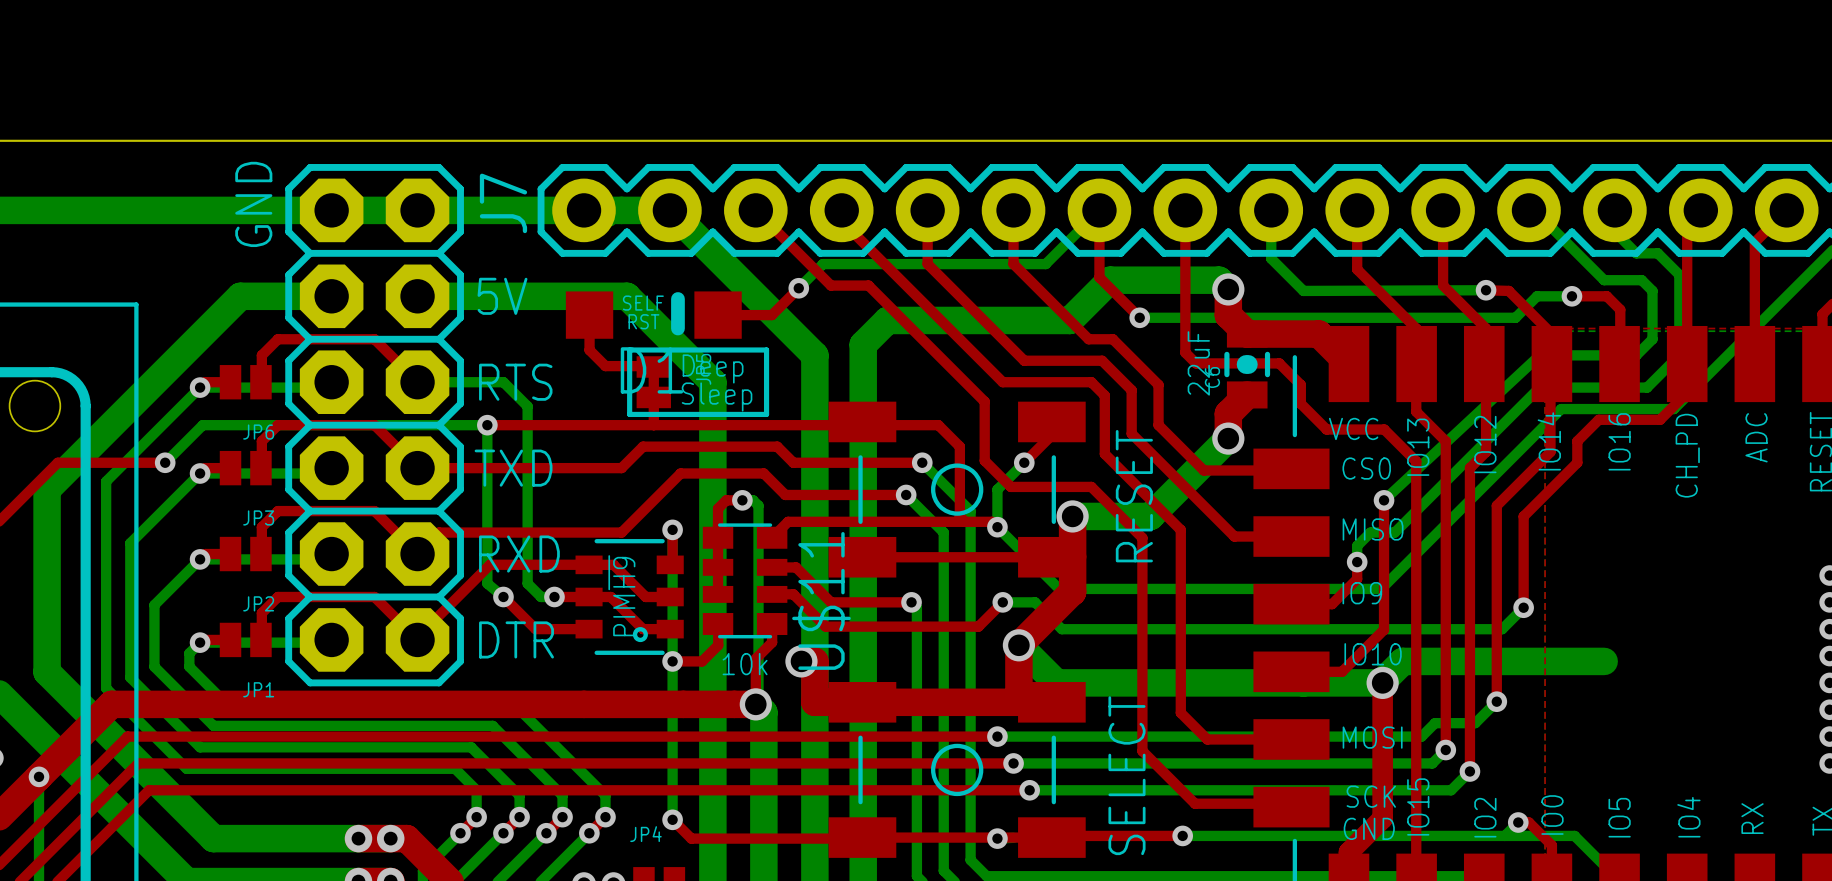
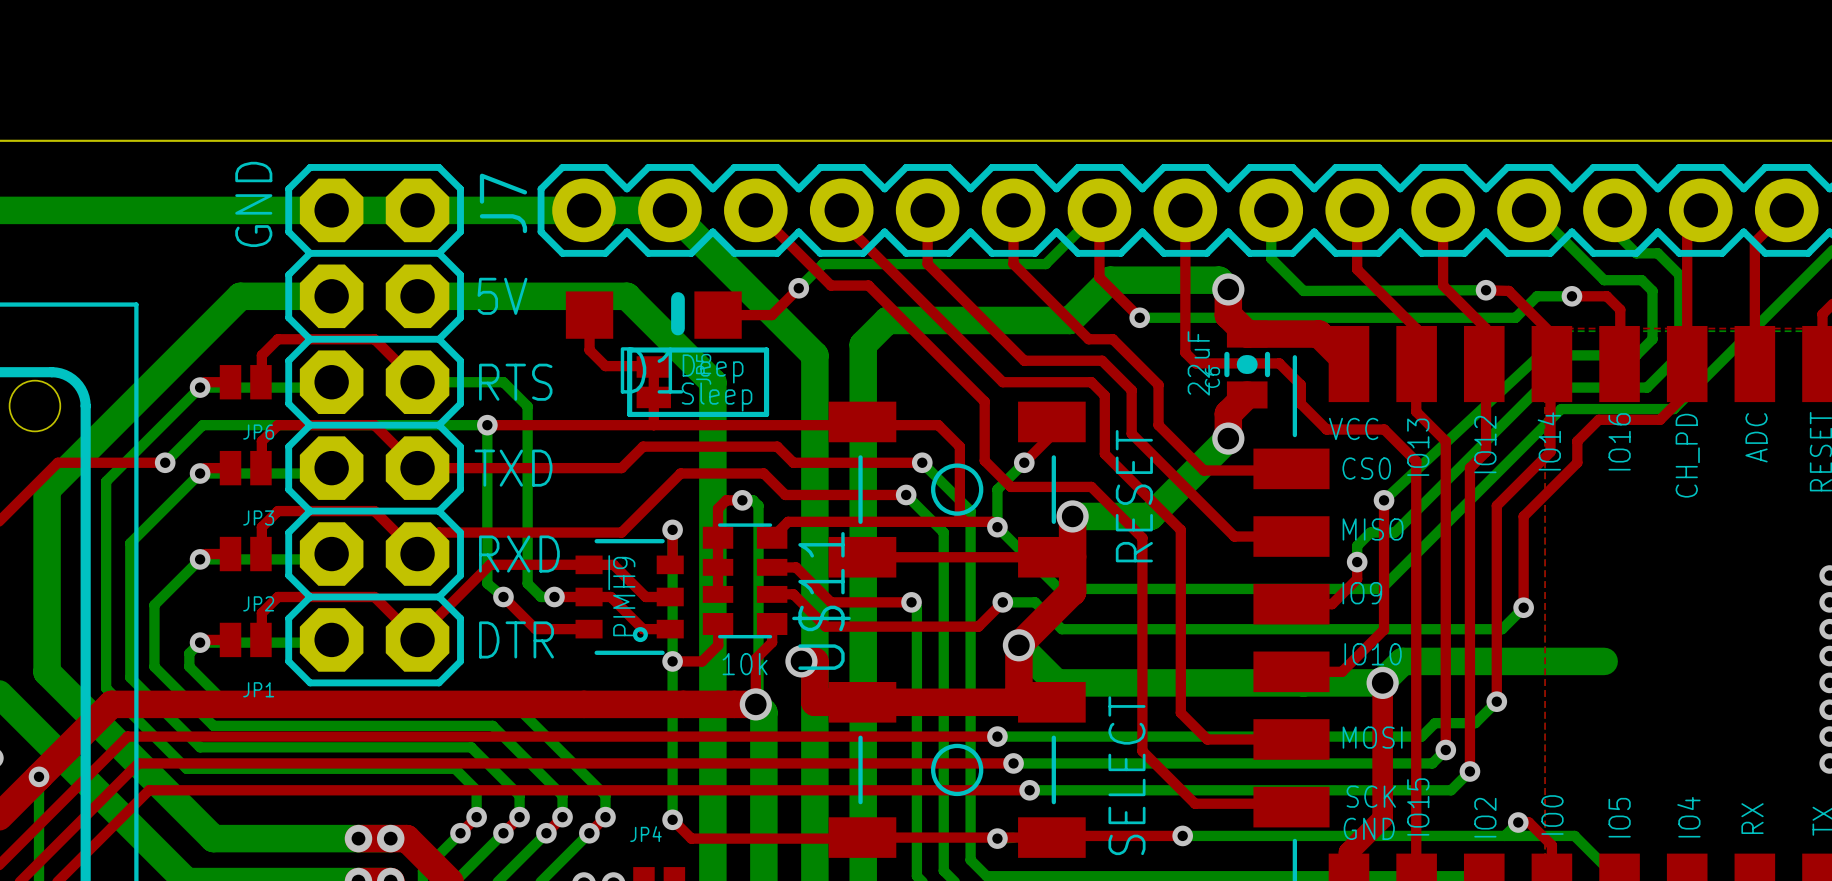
text: SELF (643, 303) -> none
text: RST (643, 321) -> none

